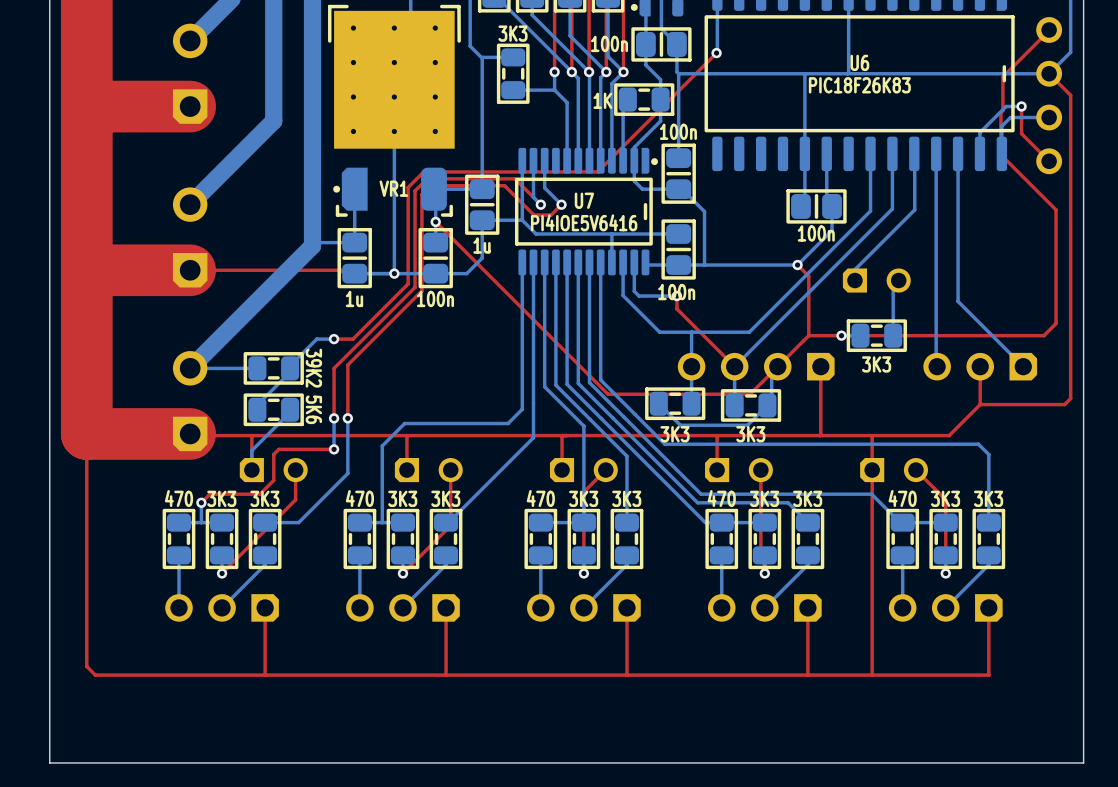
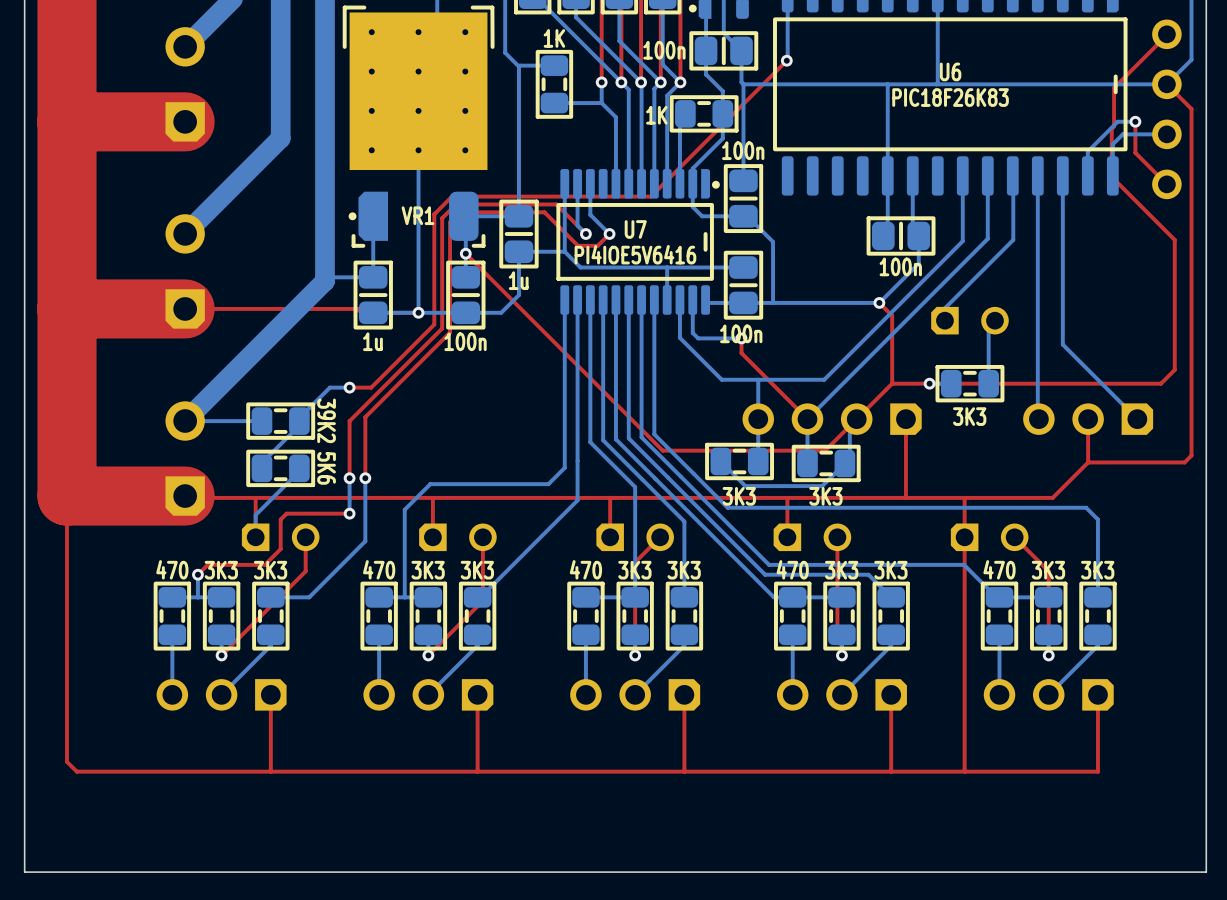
part value: 3K3 (513, 33) -> 1K (554, 38)

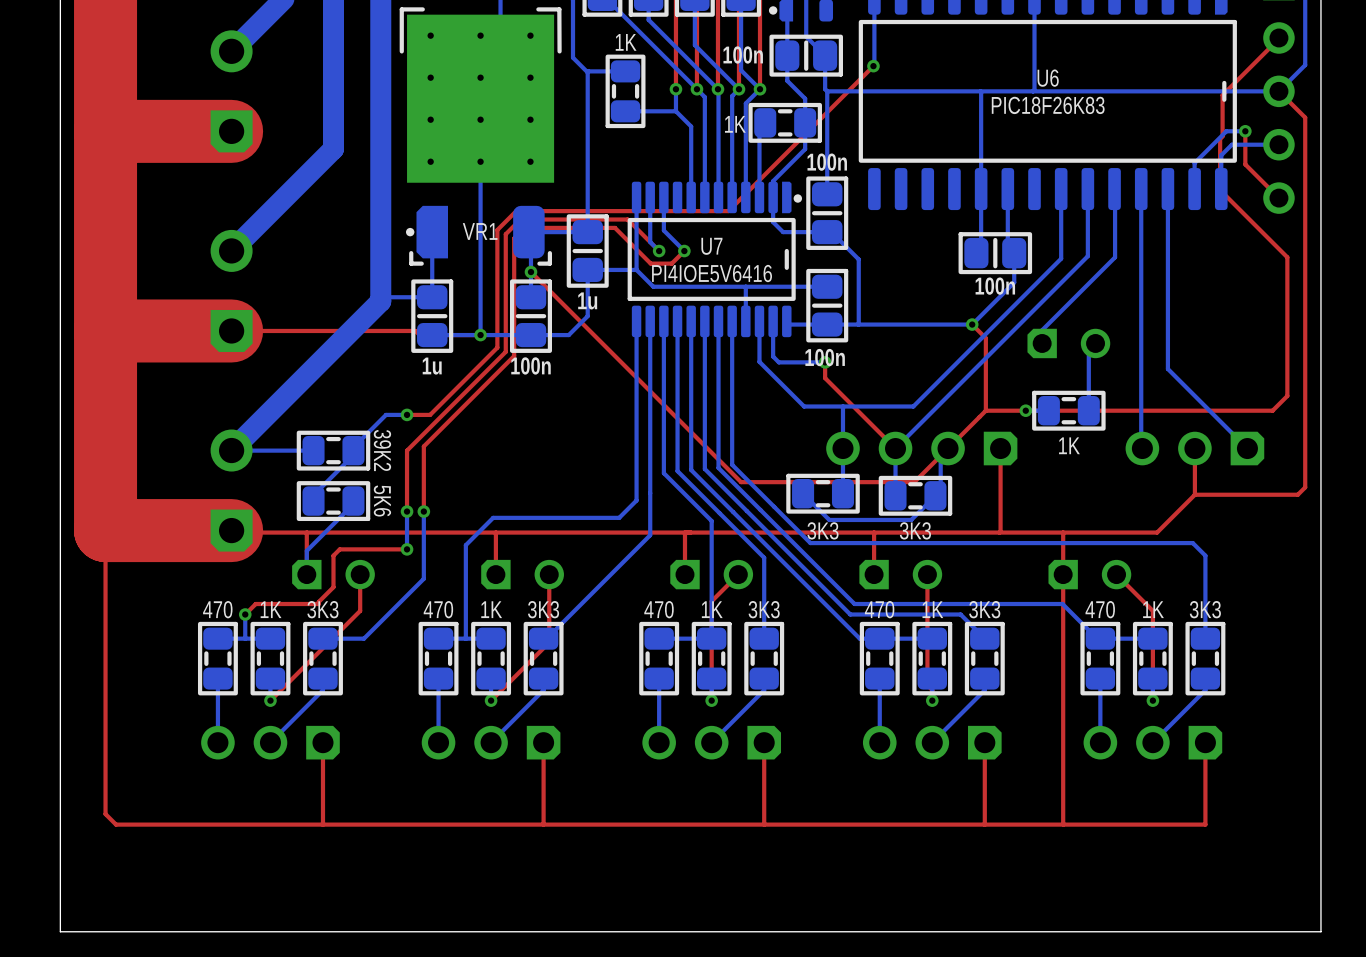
part value: 3K3 (969, 416) -> 1K (1069, 445)
part value: 3K3 (221, 570) -> 1K (271, 609)
part value: 3K3 (428, 570) -> 1K (491, 609)
part value: 3K3 (634, 570) -> 1K (712, 609)
part value: 3K3 (841, 570) -> 1K (932, 609)
part value: 3K3 (1048, 570) -> 1K (1153, 609)

